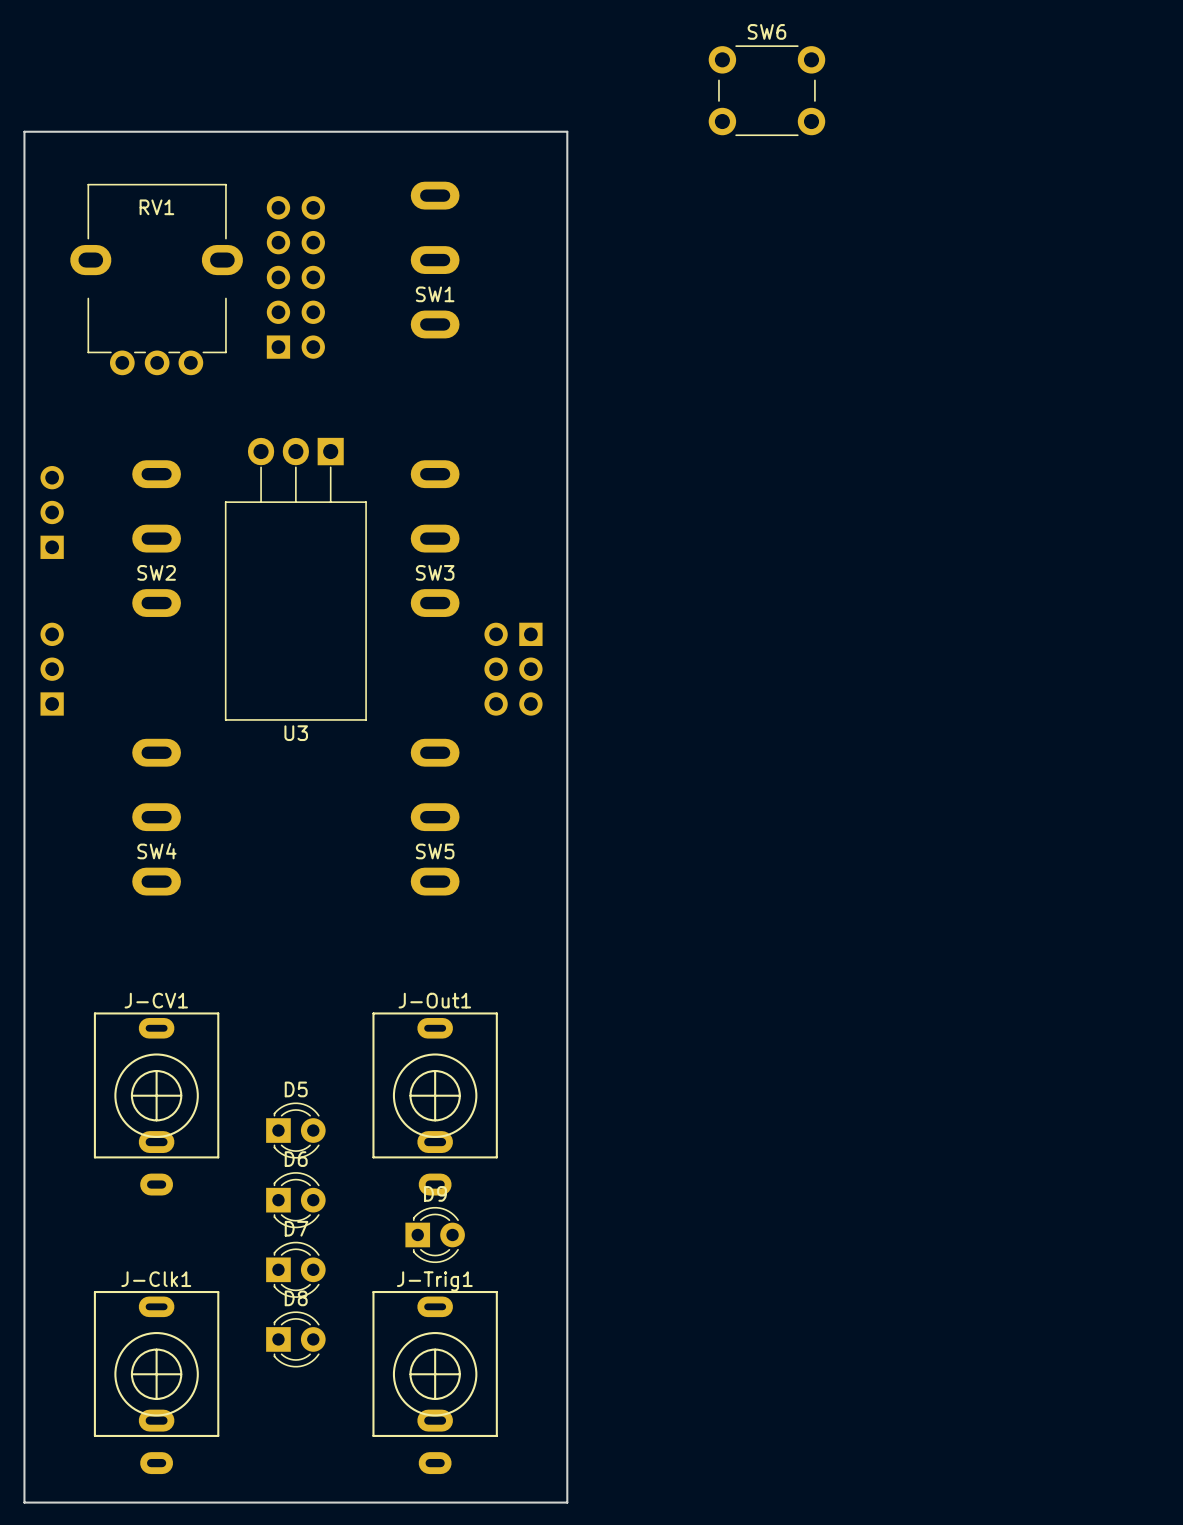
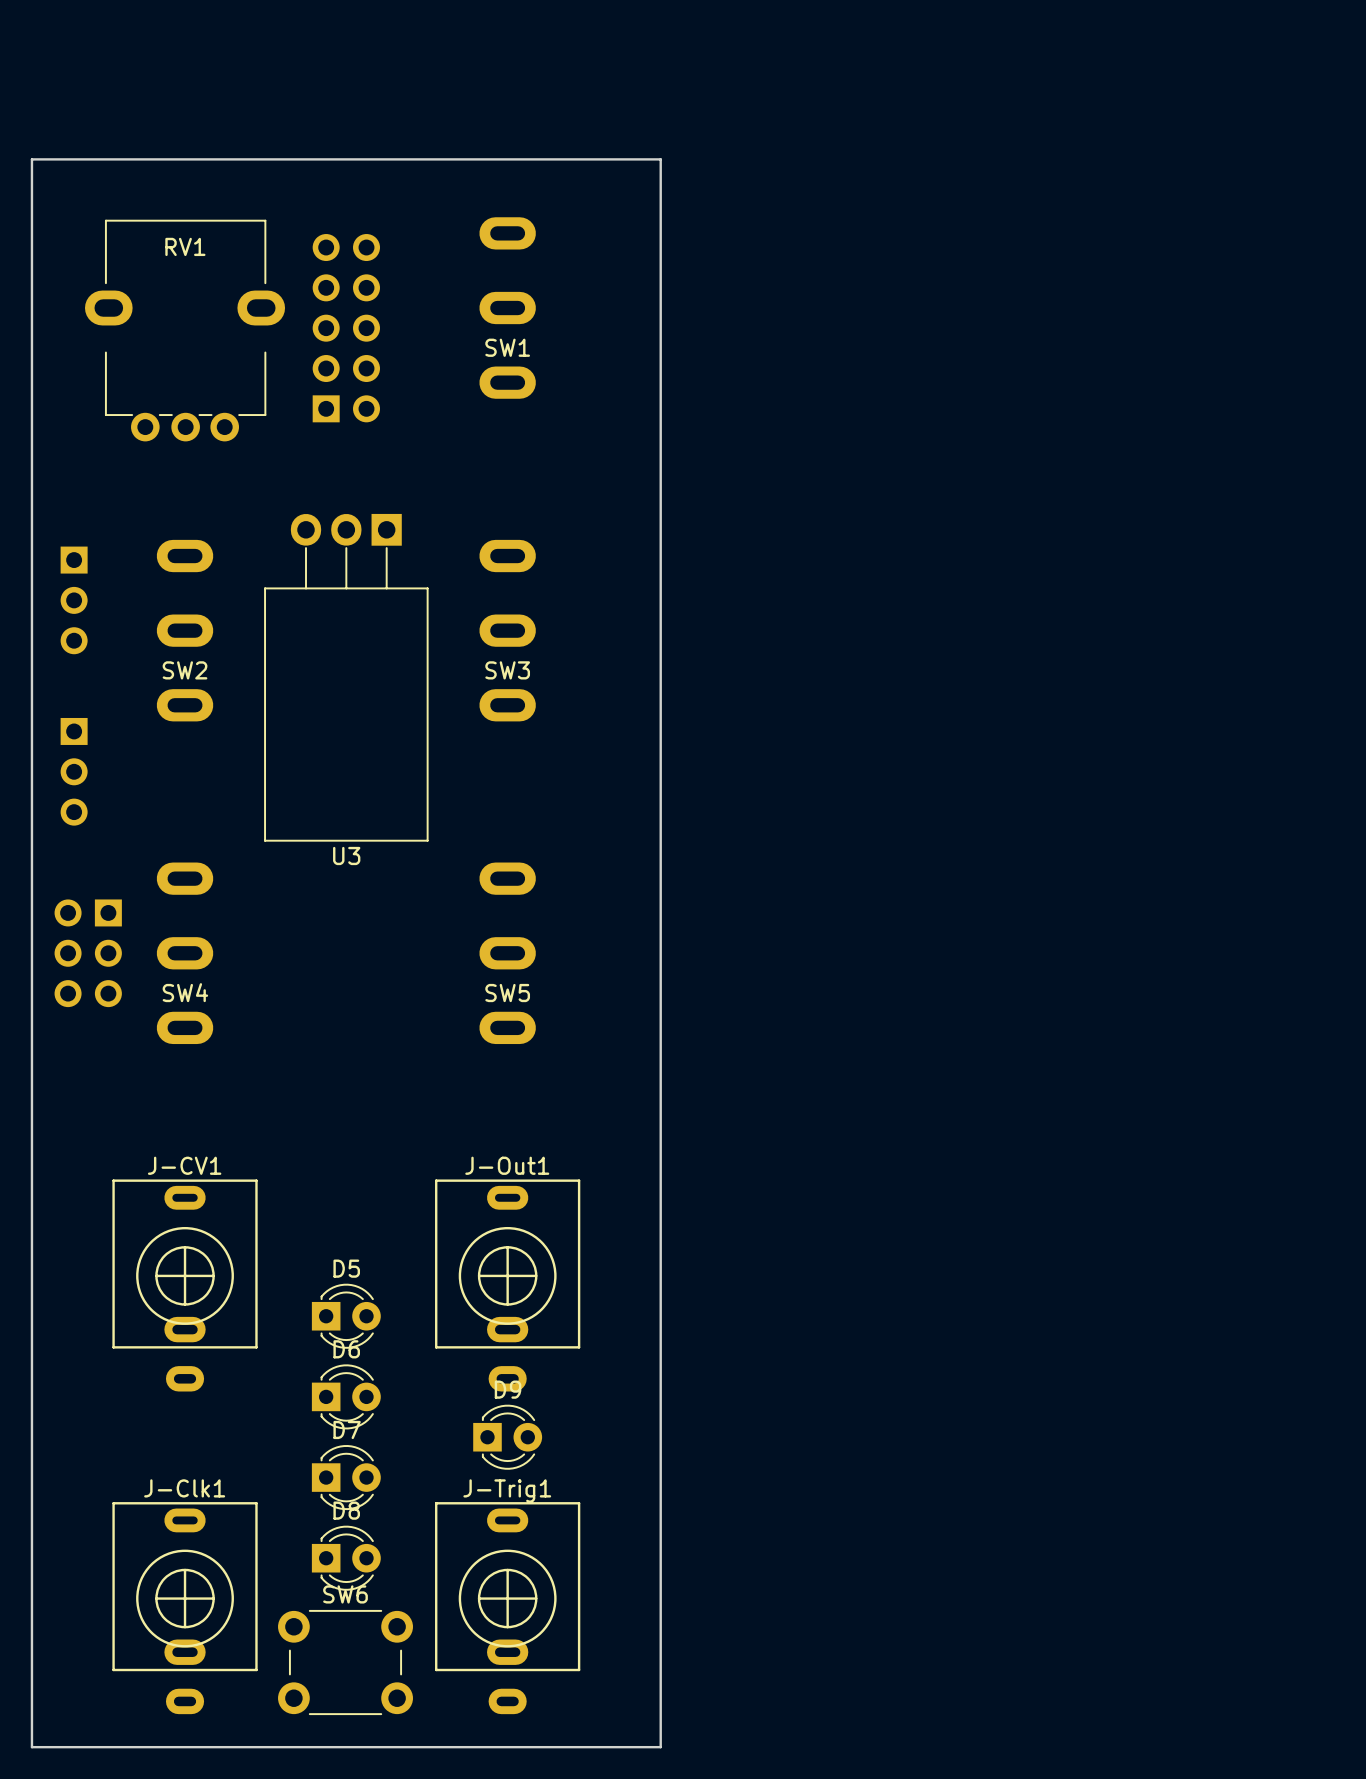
SW6 position: (766, 90) -> (345, 1662)
part rotation: 0° (52, 512) -> 180° (74, 600)
part rotation: 0° (52, 669) -> 180° (74, 771)
part: (513, 669) -> none
part: none -> (88, 953)

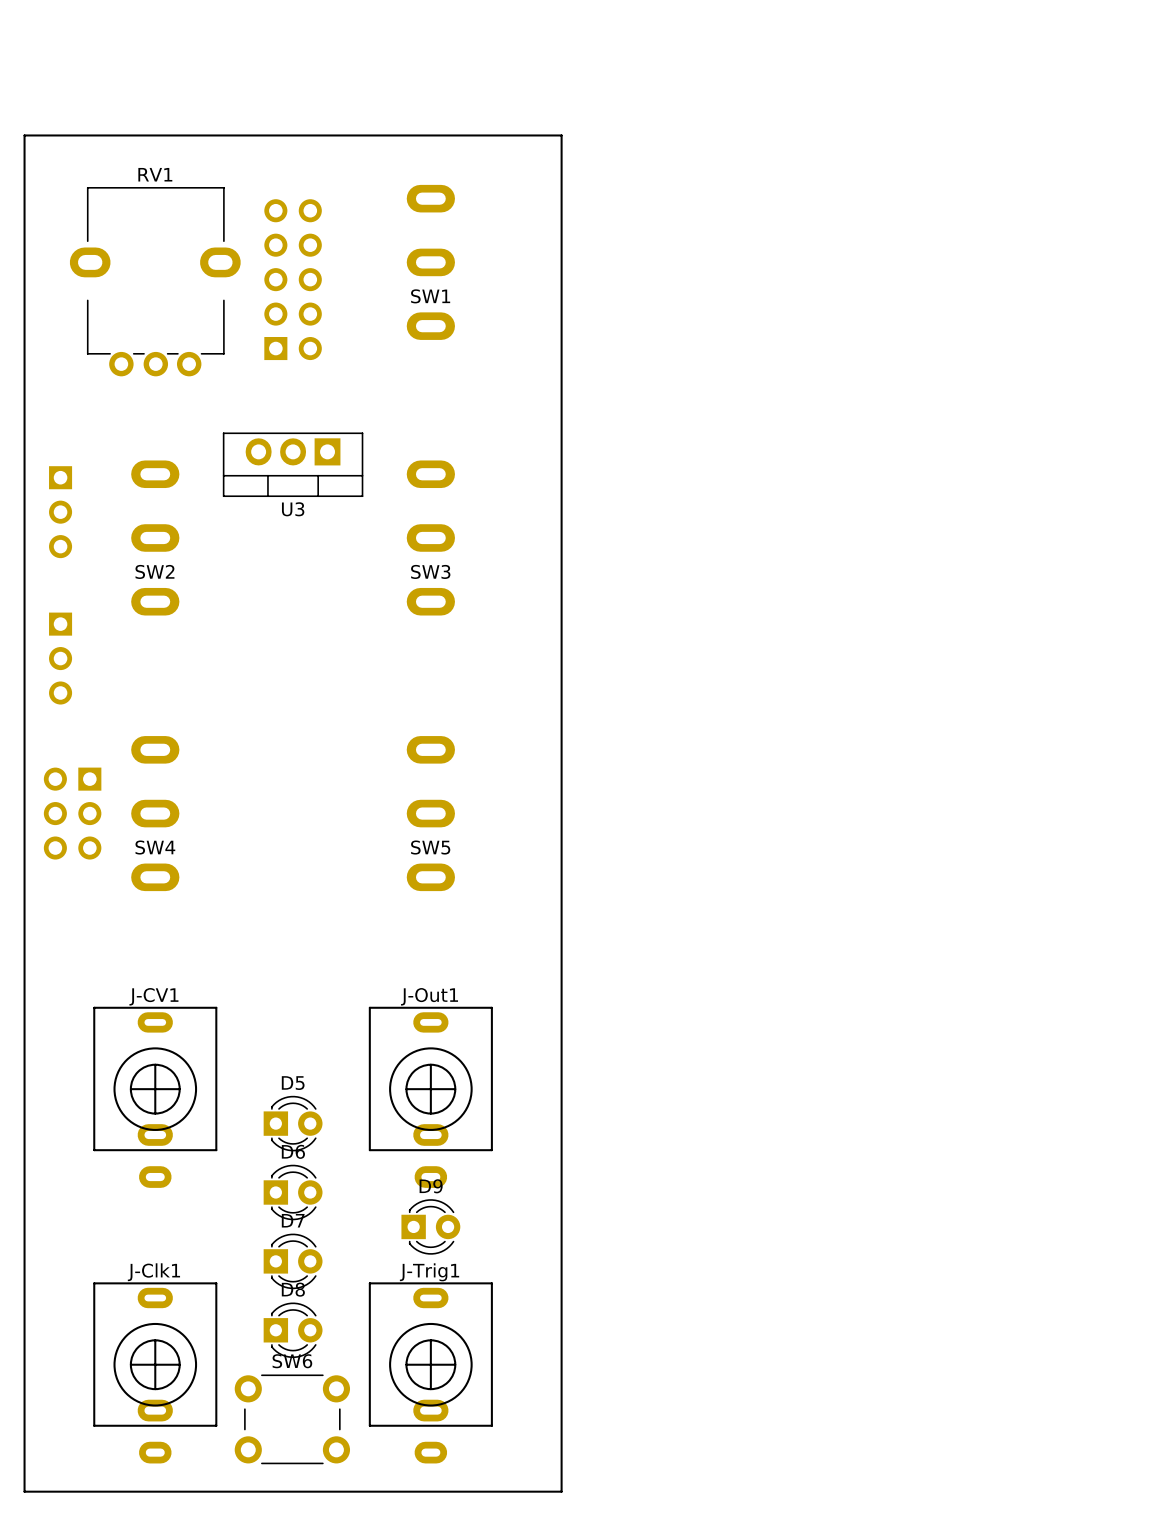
RV1 name position: RV1 (185, 246) -> RV1 (155, 174)
U3 footprint: [264, 513, 429, 842] -> [222, 432, 364, 498]
U3 name position: U3 (346, 855) -> U3 (293, 509)

